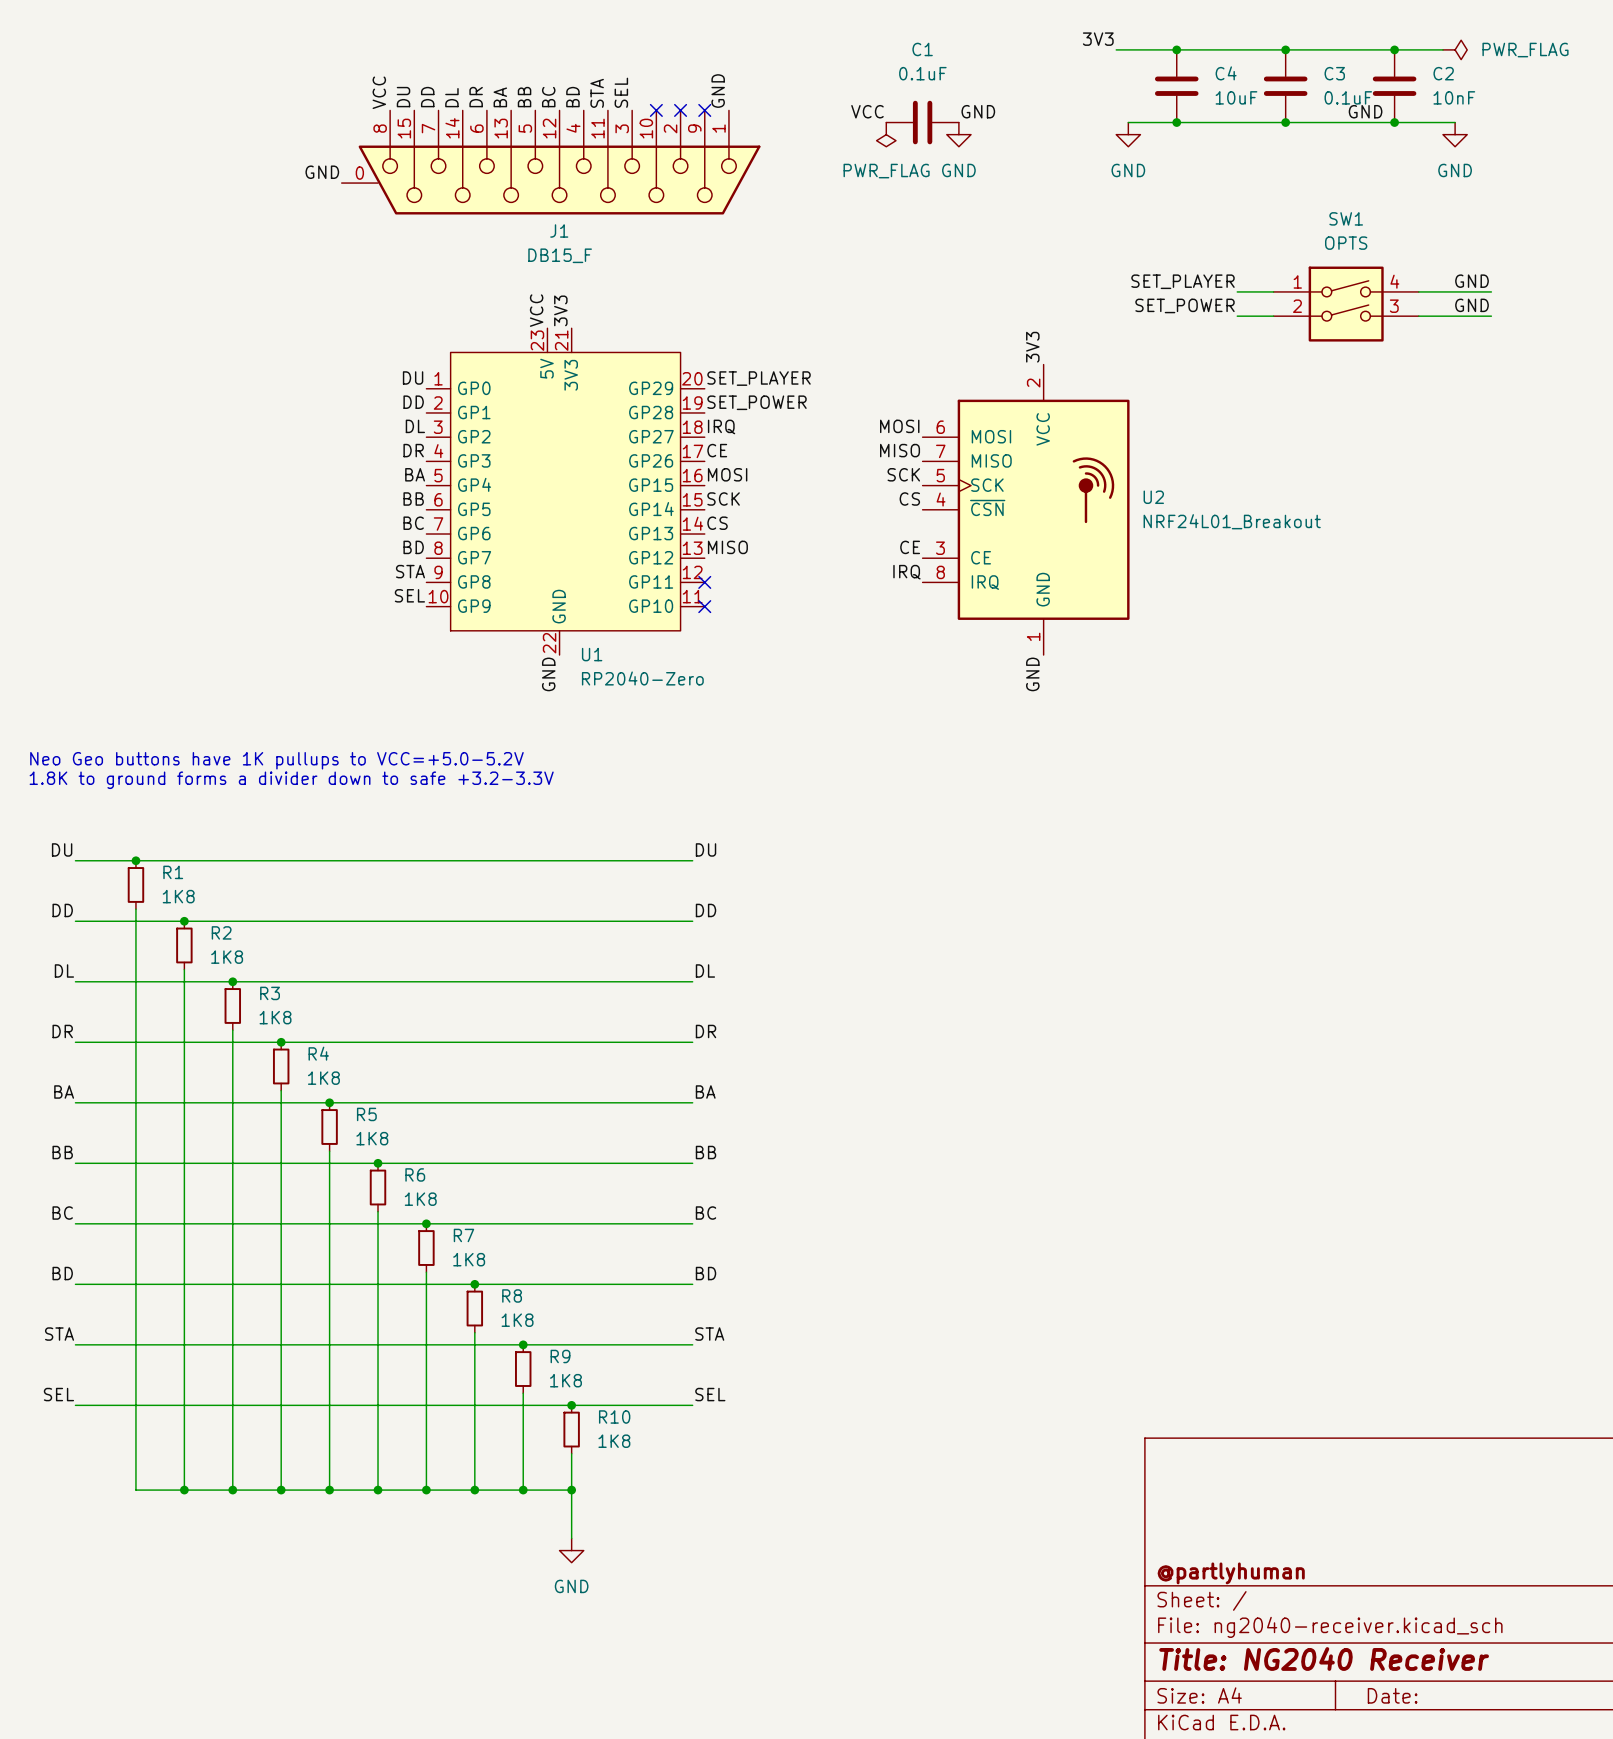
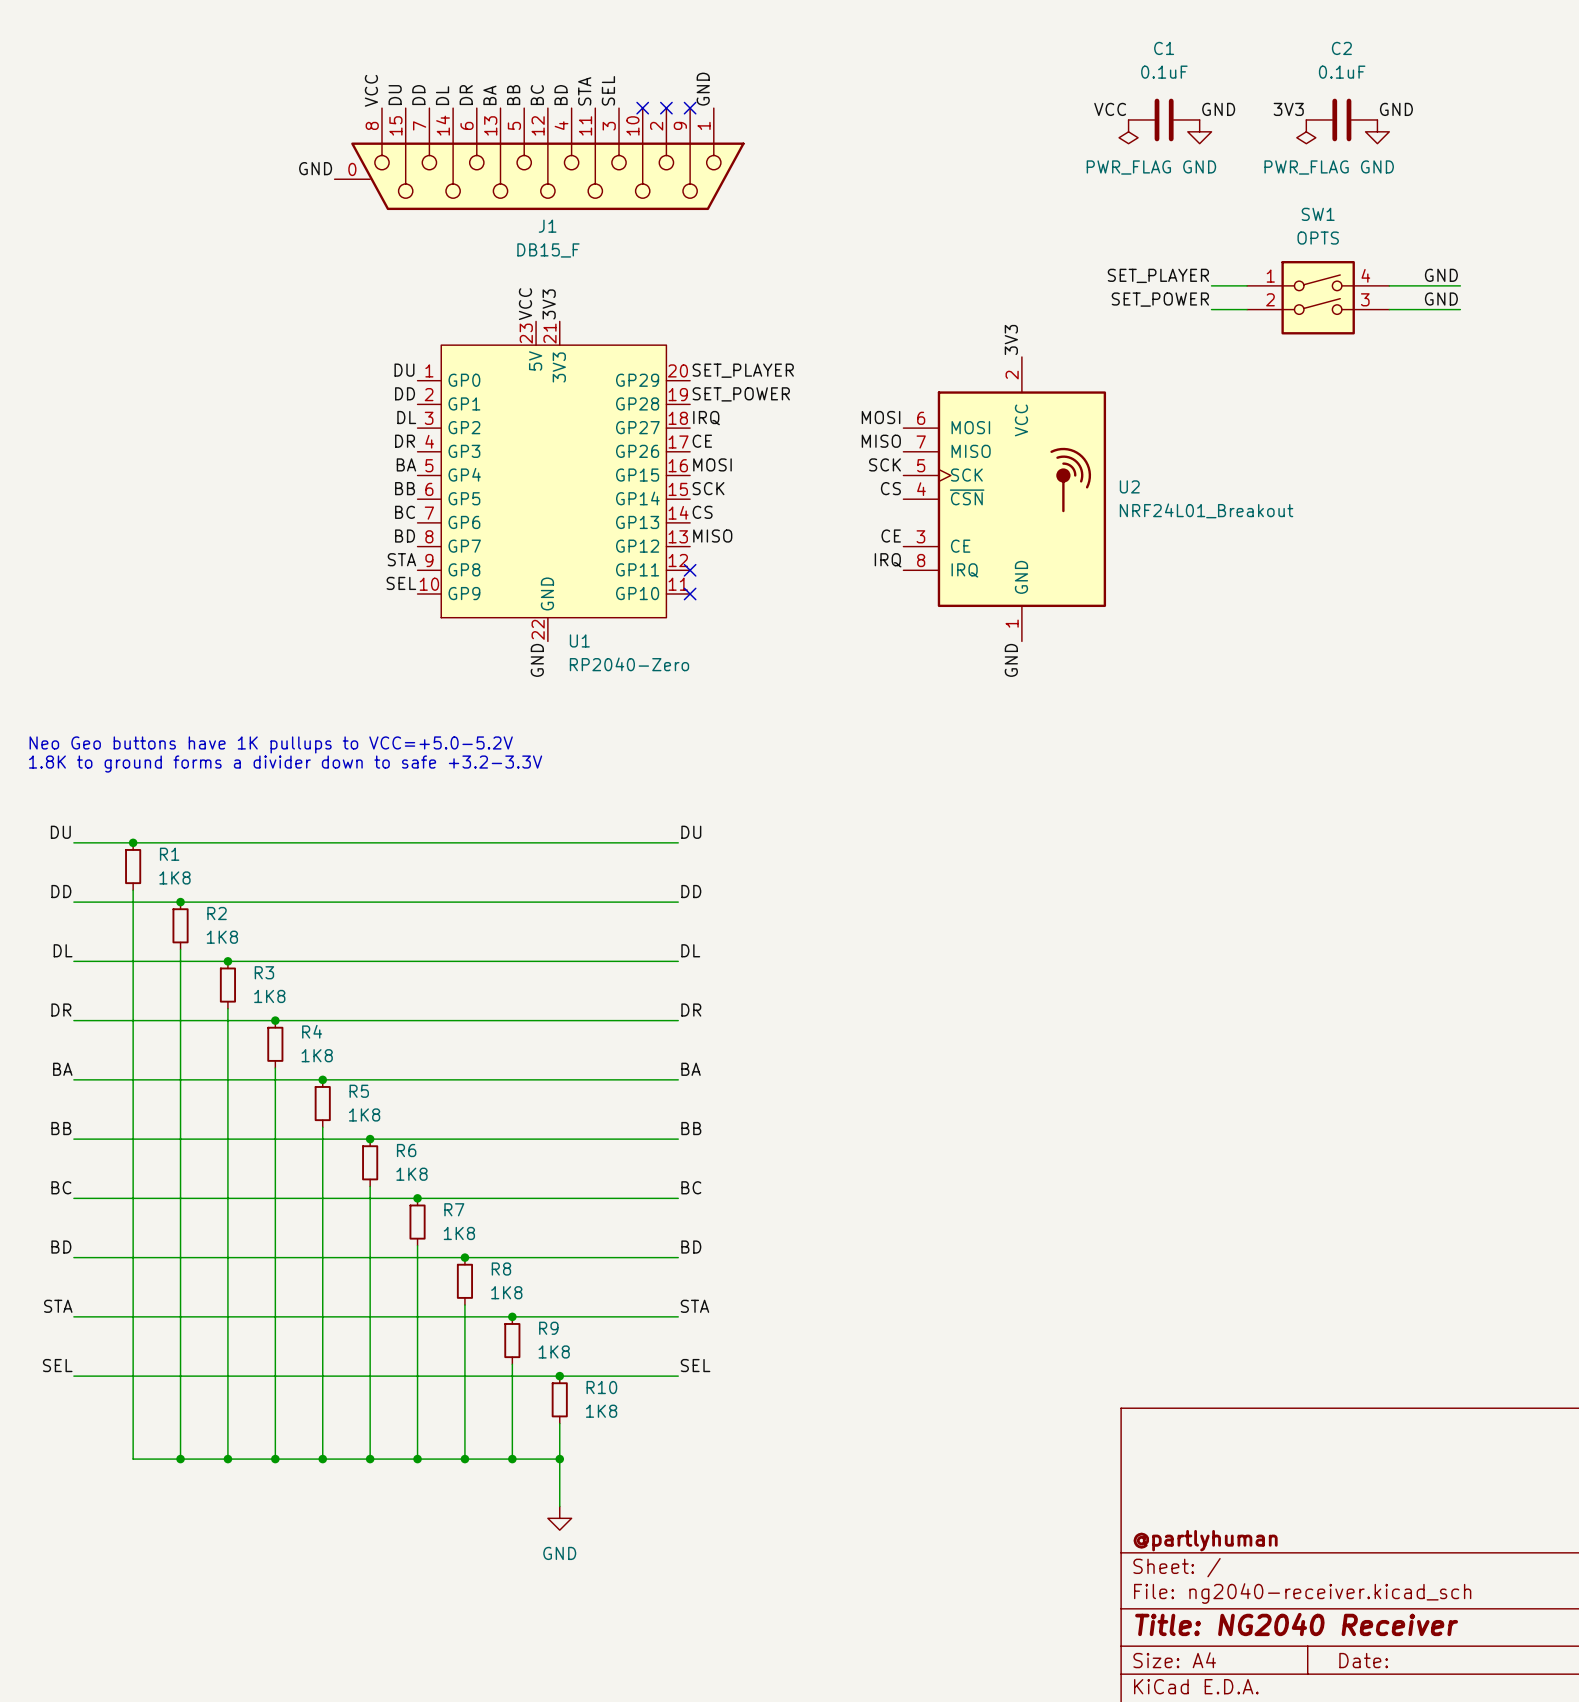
label position: 3V3 (1098, 39) -> 3V3 (1288, 109)
wire: (1116, 49) (1442, 49) -> none
junction: (1176, 49) -> none
junction: (1285, 49) -> none
junction: (1394, 49) -> none
power symbol rotation: 0° (1455, 49) -> 90° clockwise (1306, 131)
power symbol position: PWR_FLAG (1455, 49) -> PWR_FLAG (1306, 131)
power symbol text position: PWR_FLAG (1525, 50) -> PWR_FLAG (1306, 167)
C2 name position: C2 (1443, 73) -> C2 (1341, 48)
C4: 10uF (1176, 86) -> none
C3: 0.1uF (1285, 86) -> none
C2 rotation: 0° (1394, 86) -> 90° clockwise (1341, 119)
C2 position: (1394, 86) -> (1341, 119)
C2 value: 10nF (1454, 97) -> 0.1uF (1342, 72)
label: VCC (867, 111) -> none
label: GND (978, 111) -> none
label: none -> VCC (1110, 109)
label: none -> GND (1218, 109)
label: GND (1365, 111) -> none
label: none -> GND (1396, 109)
C1 position: (922, 122) -> (1164, 119)
wire: (1128, 122) (1455, 122) -> none
junction: (1176, 122) -> none
junction: (1285, 122) -> none
junction: (1394, 122) -> none
power symbol: PWR_FLAG (886, 134) -> none
power symbol: GND (958, 134) -> none
power symbol position: GND (1128, 134) -> GND (1199, 131)
power symbol: none -> PWR_FLAG (1128, 131)
power symbol position: GND (1455, 134) -> GND (1377, 131)

